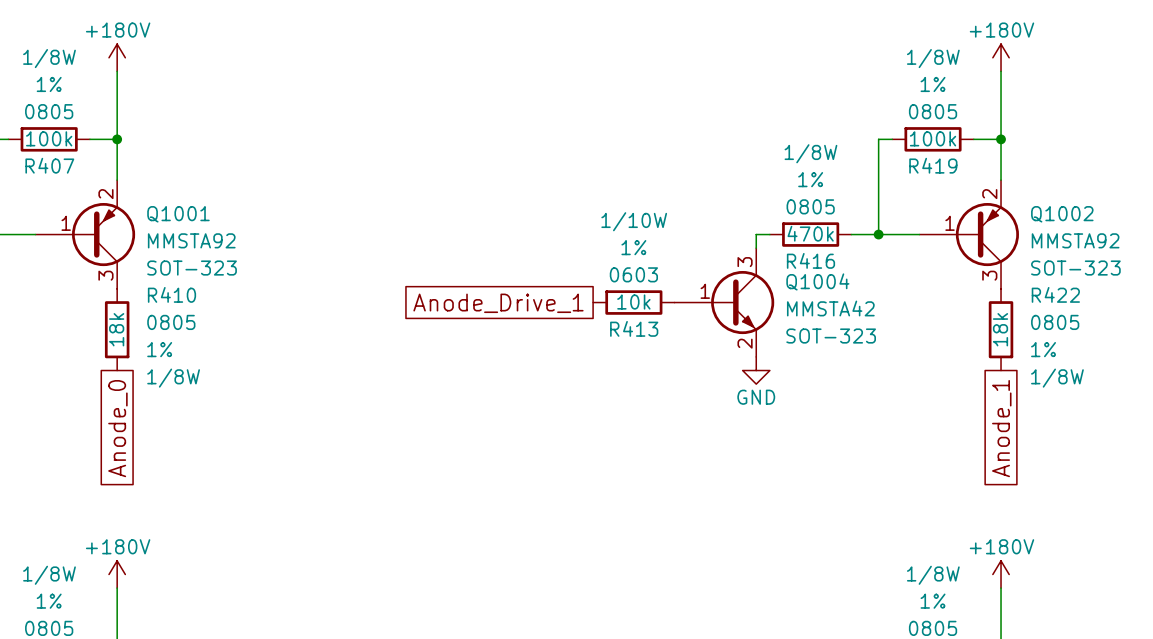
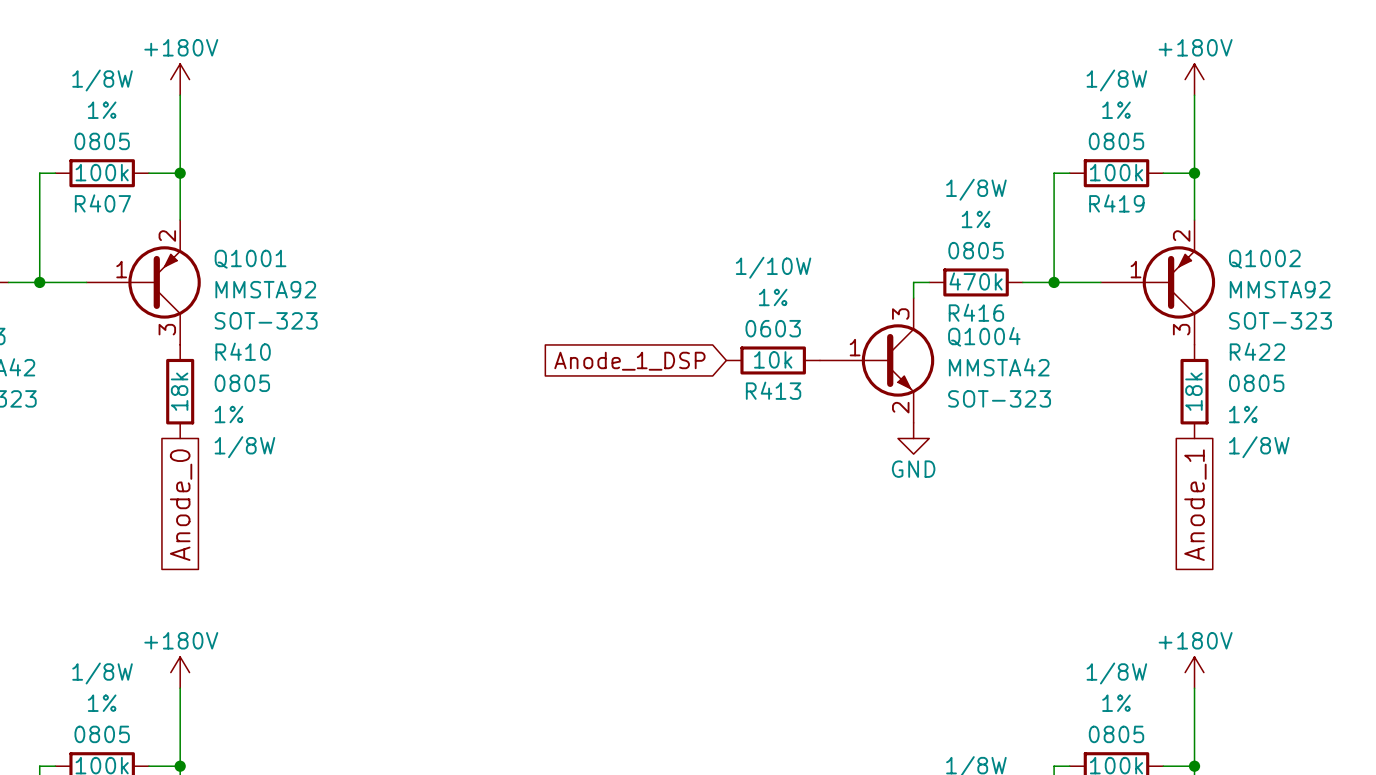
global label shape: passive (498, 303) -> input (629, 361)
global label: Anode_Drive_1 (498, 303) -> Anode_1_DSP (629, 361)

